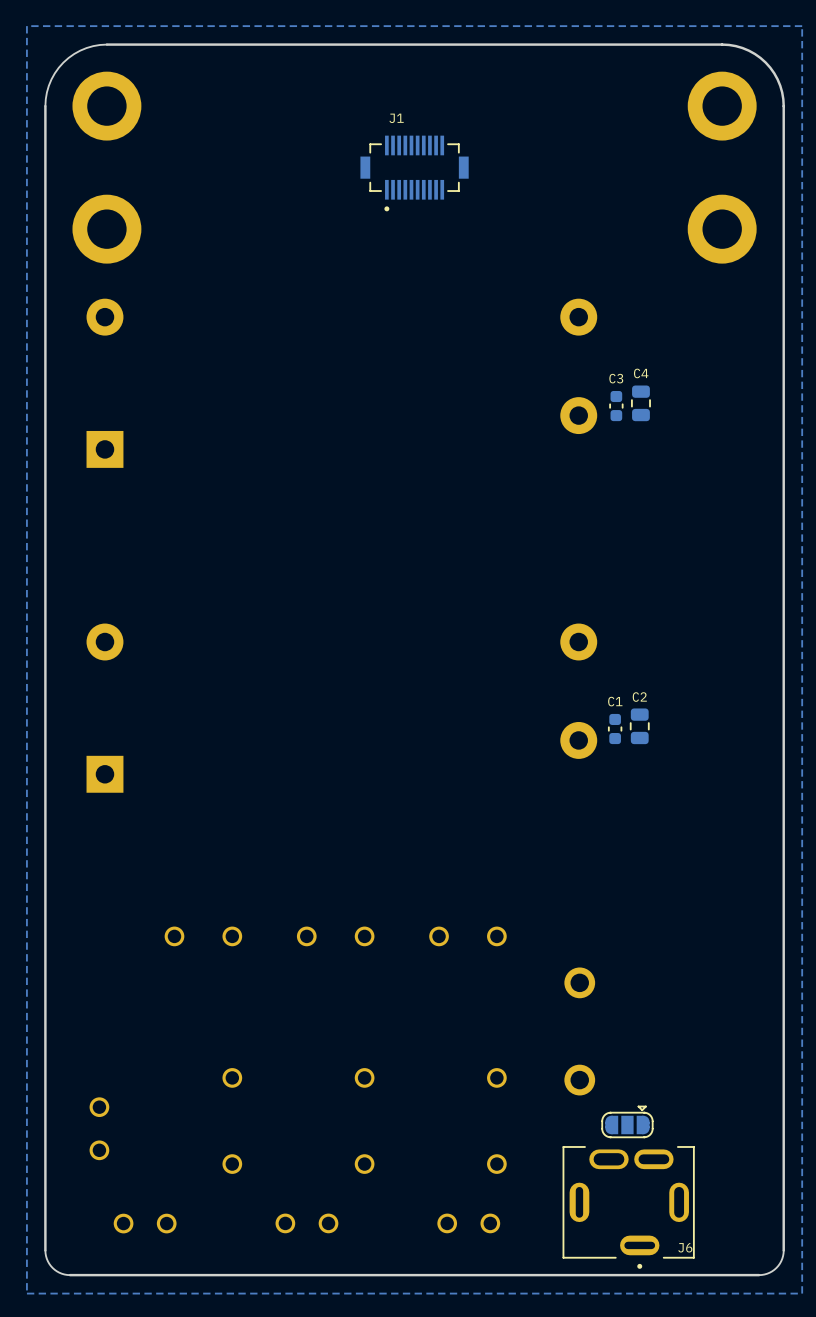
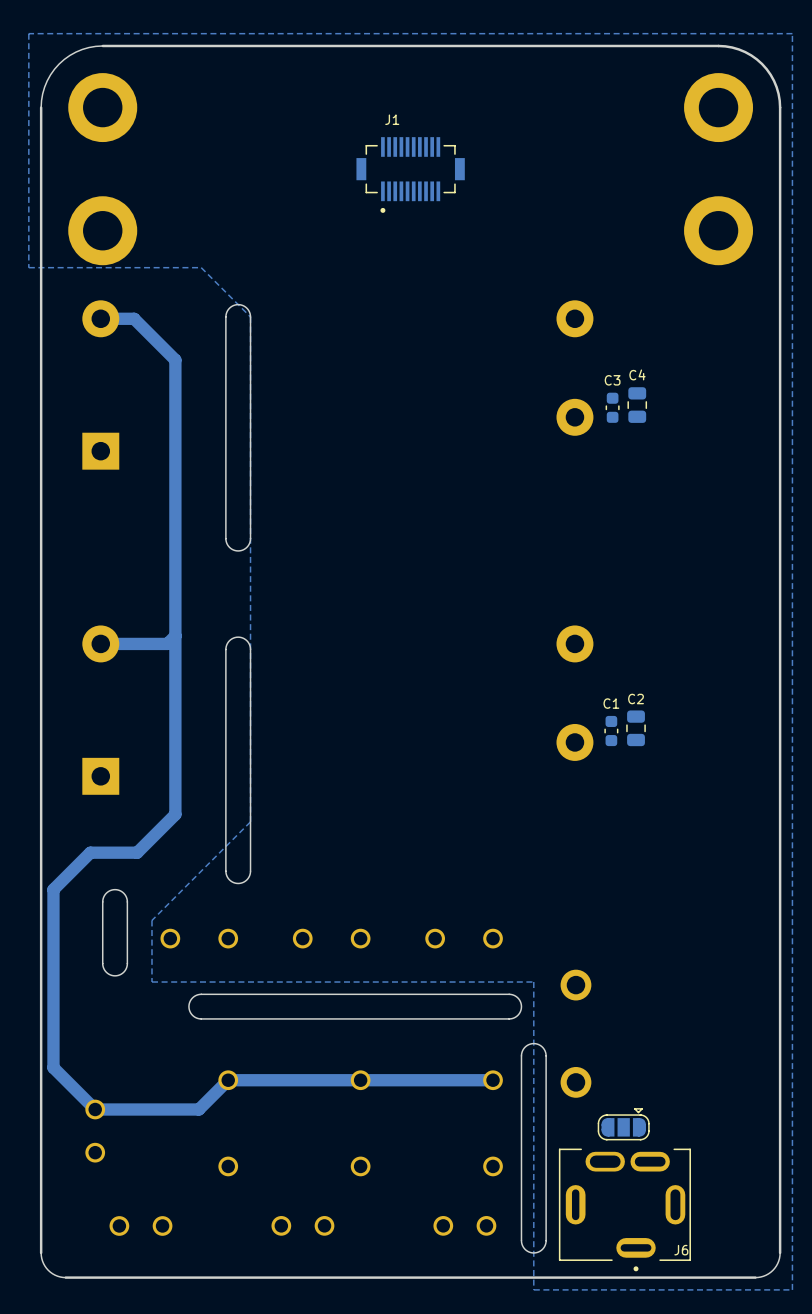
zone outline: (802, 26) (802, 1293) (26, 1293) (26, 26) (802, 26) -> (792, 33) (792, 1289) (533, 1289) (533, 982) (151, 982) (151, 920) (250, 821) (250, 316) (201, 267) (28, 267) (28, 33) (792, 33)
board edge: none -> (250, 316) (250, 538) (246, 547) (238, 550) (229, 547) (225, 538) (225, 316) (229, 308) (238, 304) (246, 308) (250, 316)
track: none -> (100, 318) (134, 318) (175, 360) (175, 814) (137, 852) (90, 852) (53, 889) (53, 1067) (95, 1109) (198, 1109) (228, 1080) (493, 1080)
track: none -> (175, 635) (167, 643) (100, 643)
board edge: none -> (250, 649) (250, 871) (246, 879) (238, 883) (229, 879) (225, 871) (225, 649) (229, 640) (238, 637) (246, 640) (250, 649)
board edge: none -> (127, 901) (126, 966) (121, 974) (111, 975) (106, 972) (102, 965) (103, 898) (107, 892) (116, 889) (123, 893) (127, 901)
board edge: none -> (509, 994) (201, 994) (192, 997) (188, 1006) (192, 1015) (201, 1018) (509, 1018) (517, 1015) (521, 1006) (517, 997) (509, 994)
board edge: none -> (546, 1055) (546, 1242) (541, 1250) (532, 1252) (525, 1249) (521, 1240) (521, 1054) (526, 1046) (535, 1043) (542, 1047) (546, 1055)

